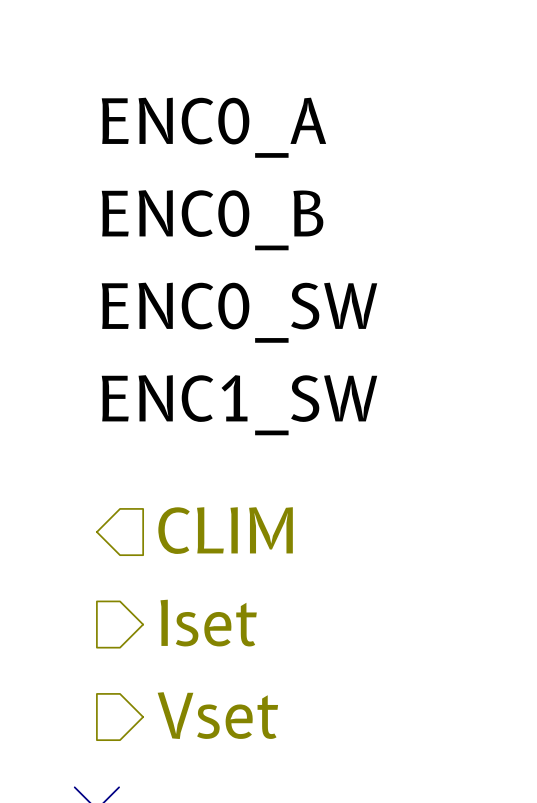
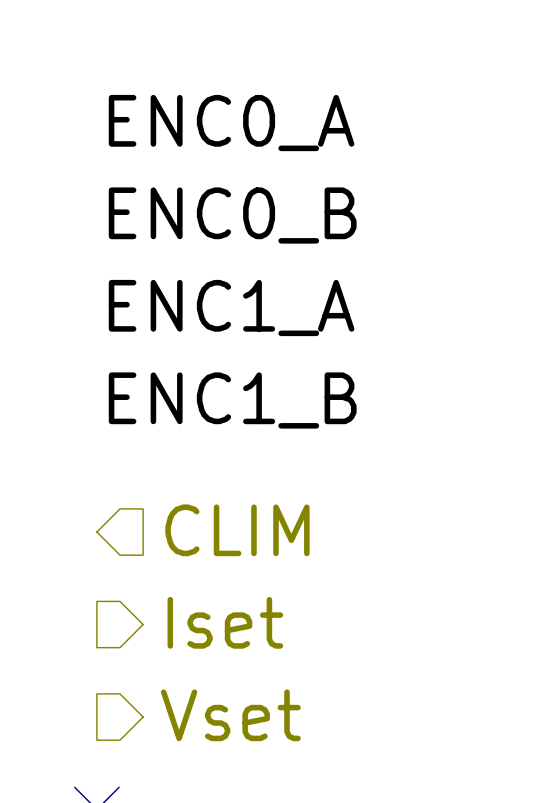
label: ENC0_SW (239, 312) -> ENC1_A (231, 308)
label: ENC1_SW (239, 405) -> ENC1_B (232, 400)

